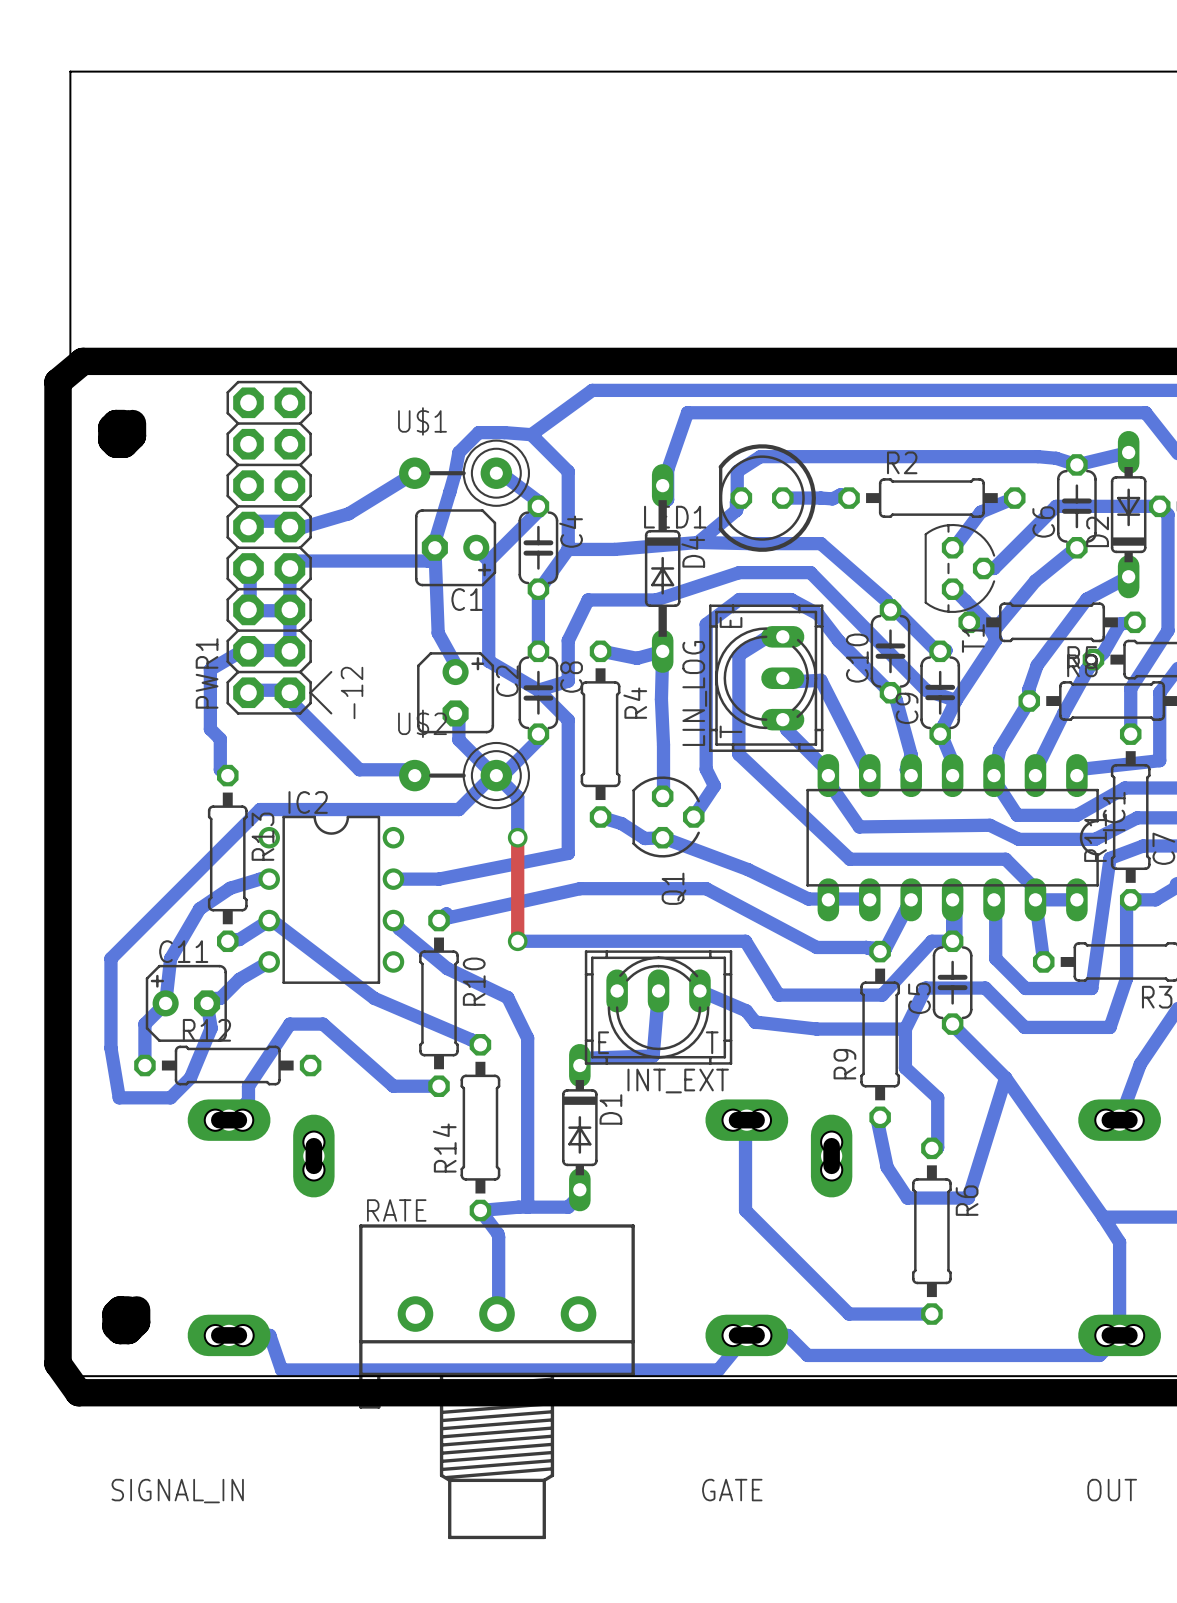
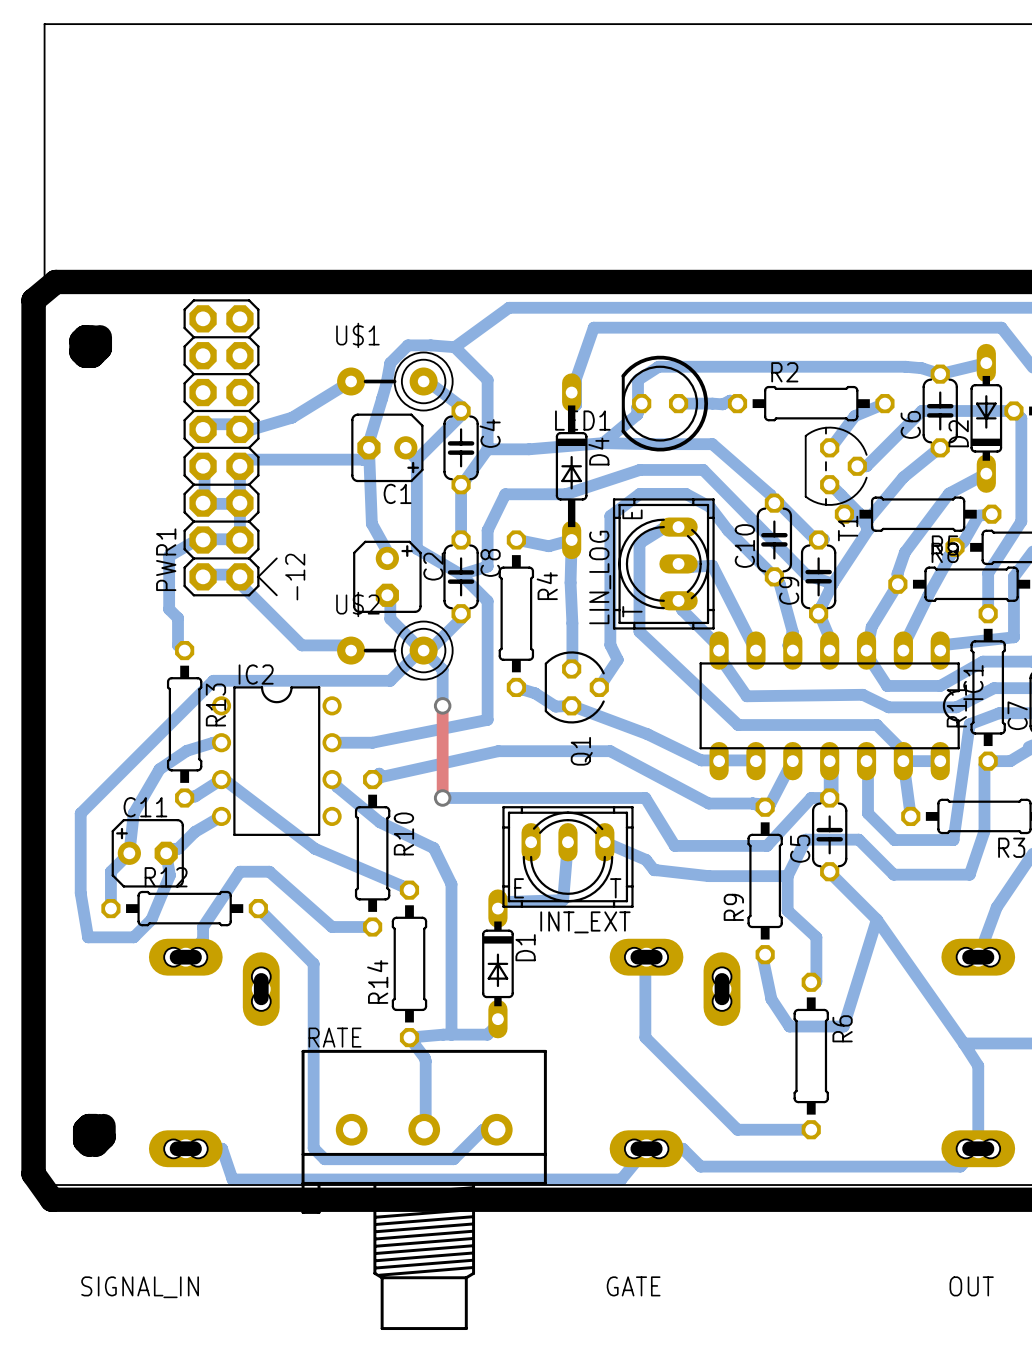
bottom track: none -> (258, 908) (313, 963) (313, 1148) (324, 1159) (453, 1159) (483, 1129) (496, 1129)

